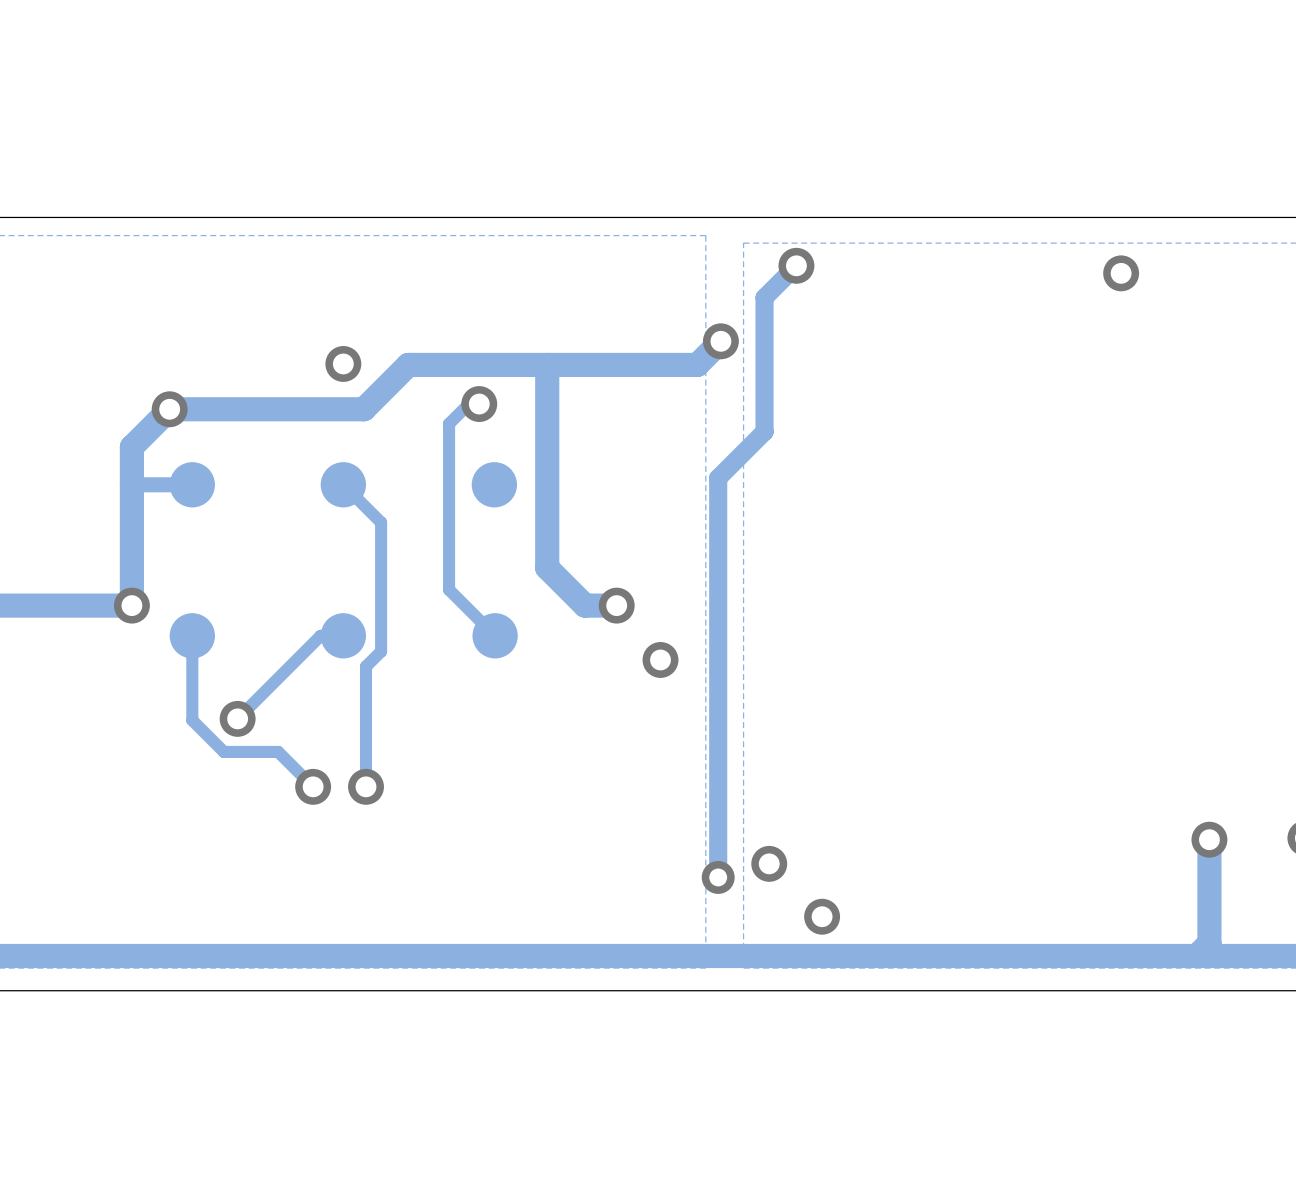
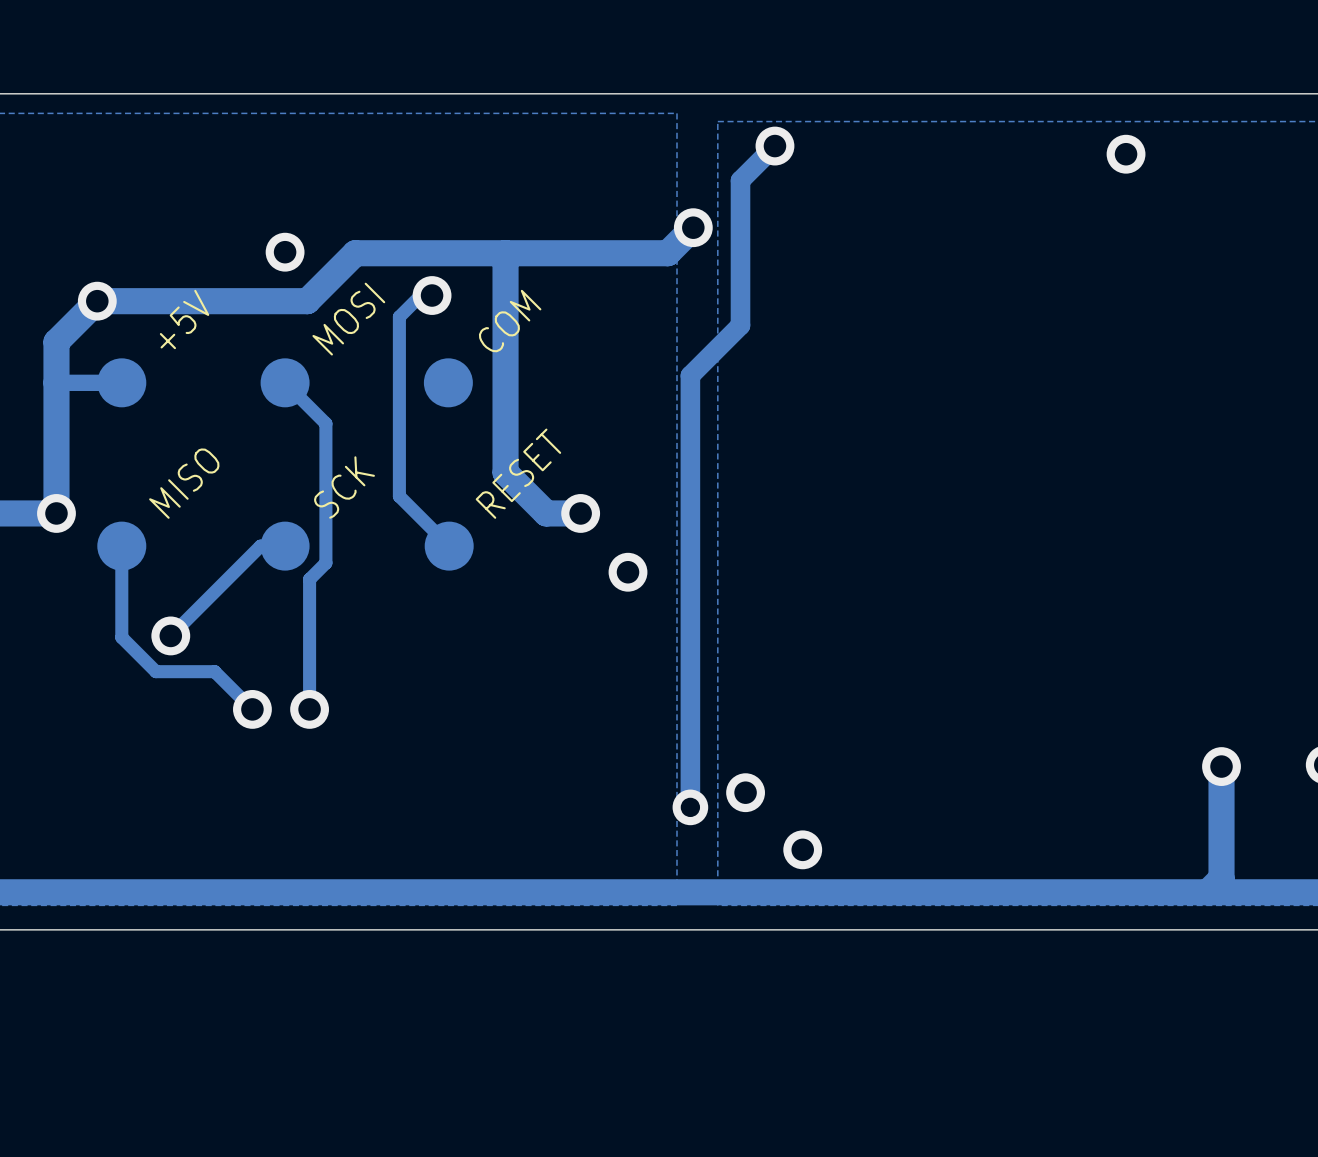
text: none -> MOSI (348, 319)
text: none -> +5V (184, 319)
text: none -> COM (510, 321)
text: none -> RESET (518, 473)
text: none -> MISO (184, 483)
text: none -> SCK (344, 487)

